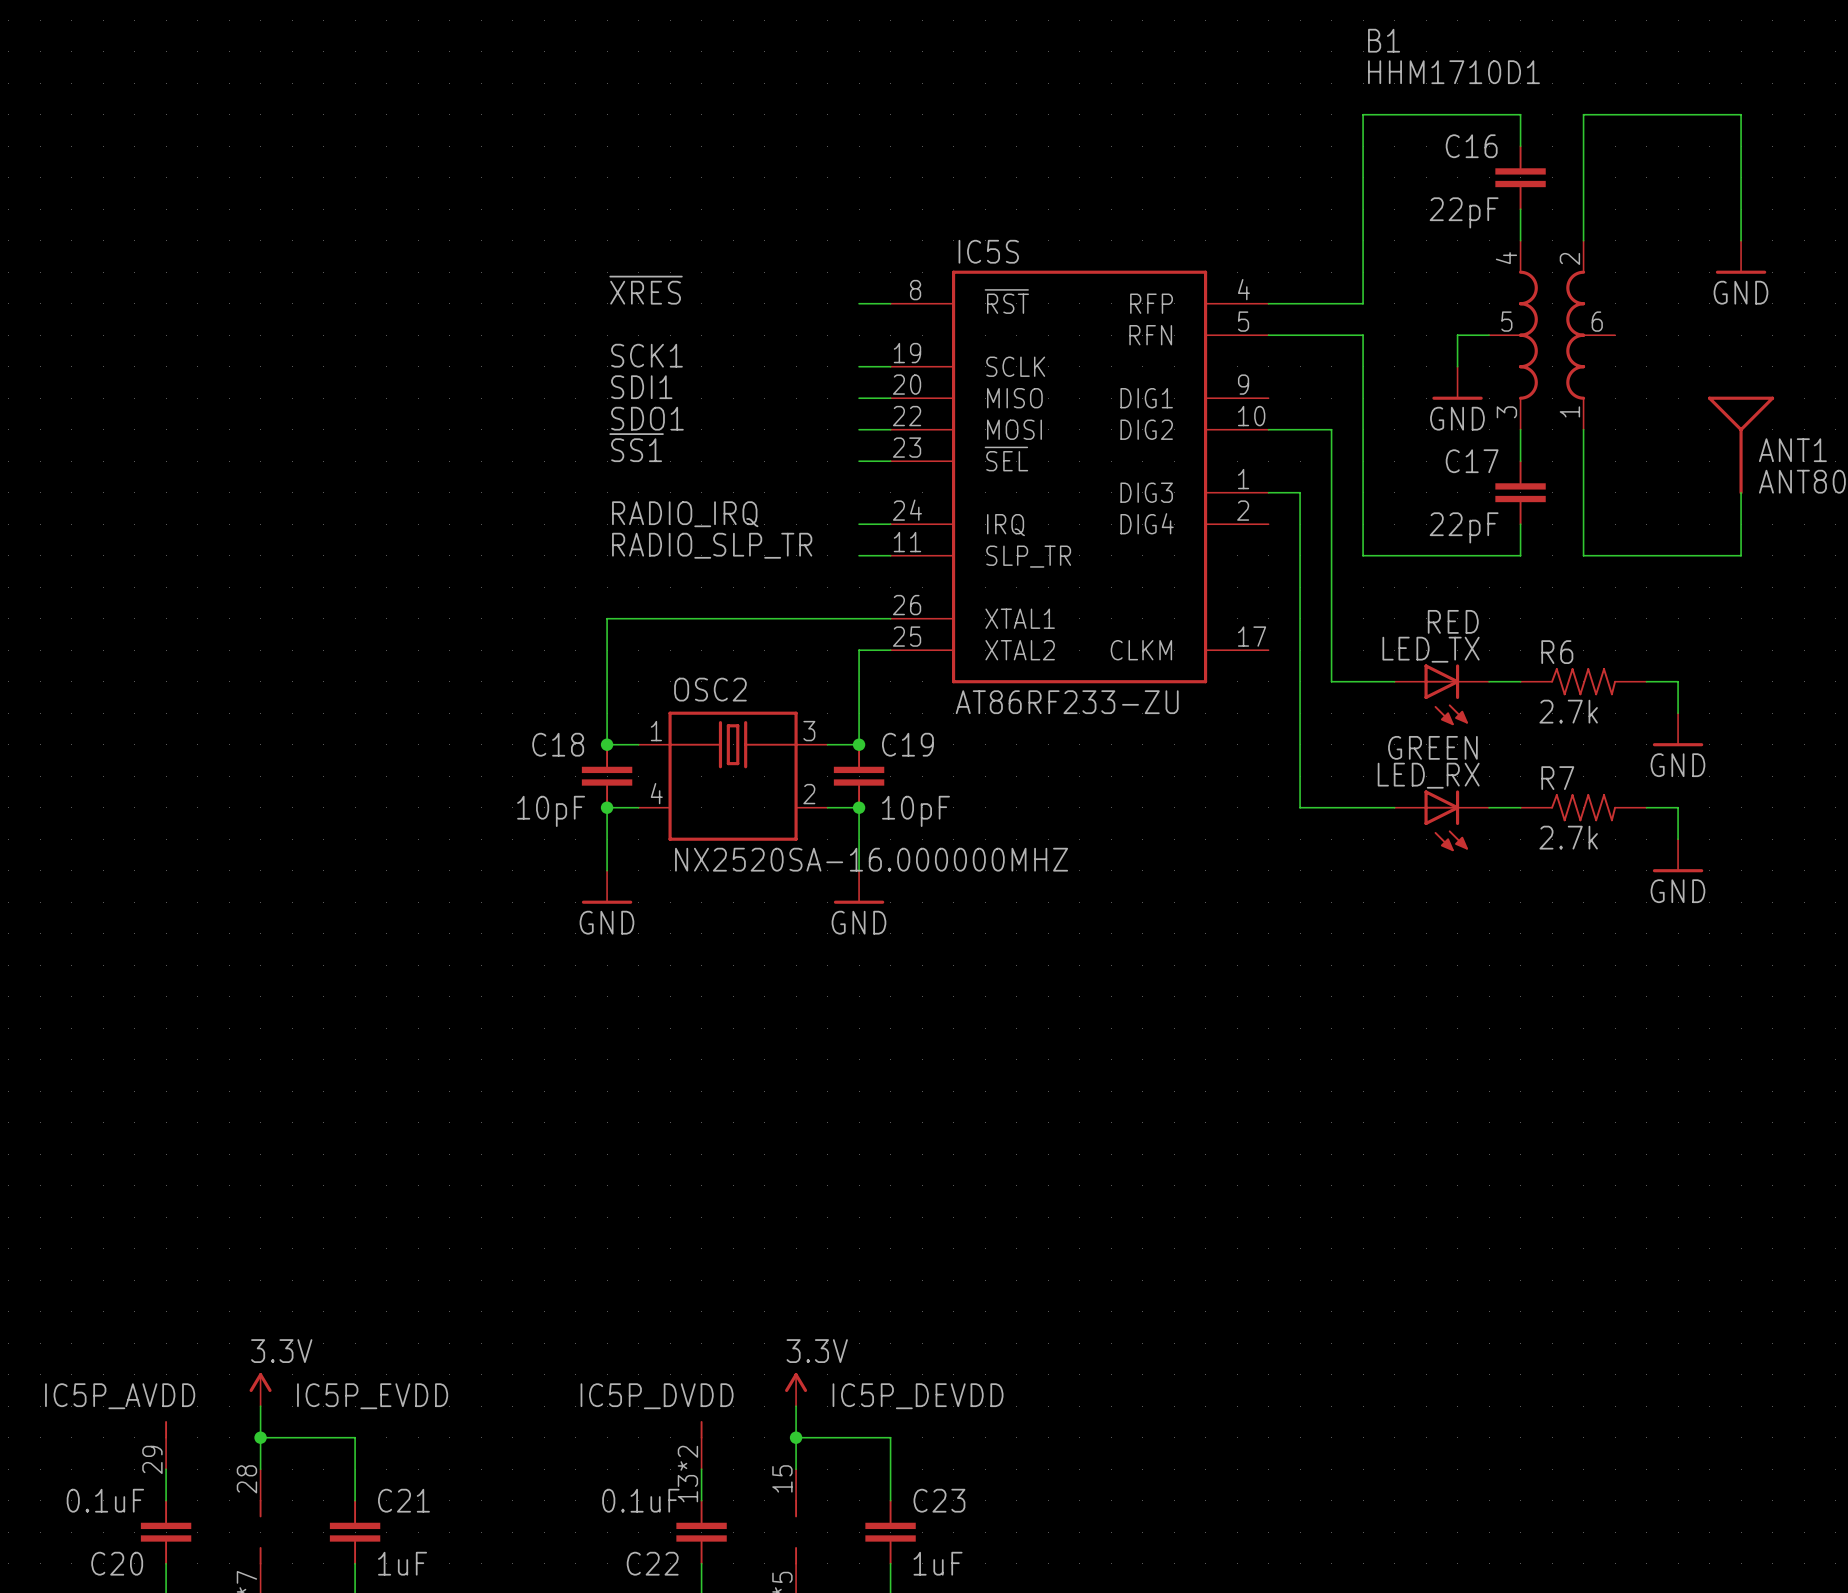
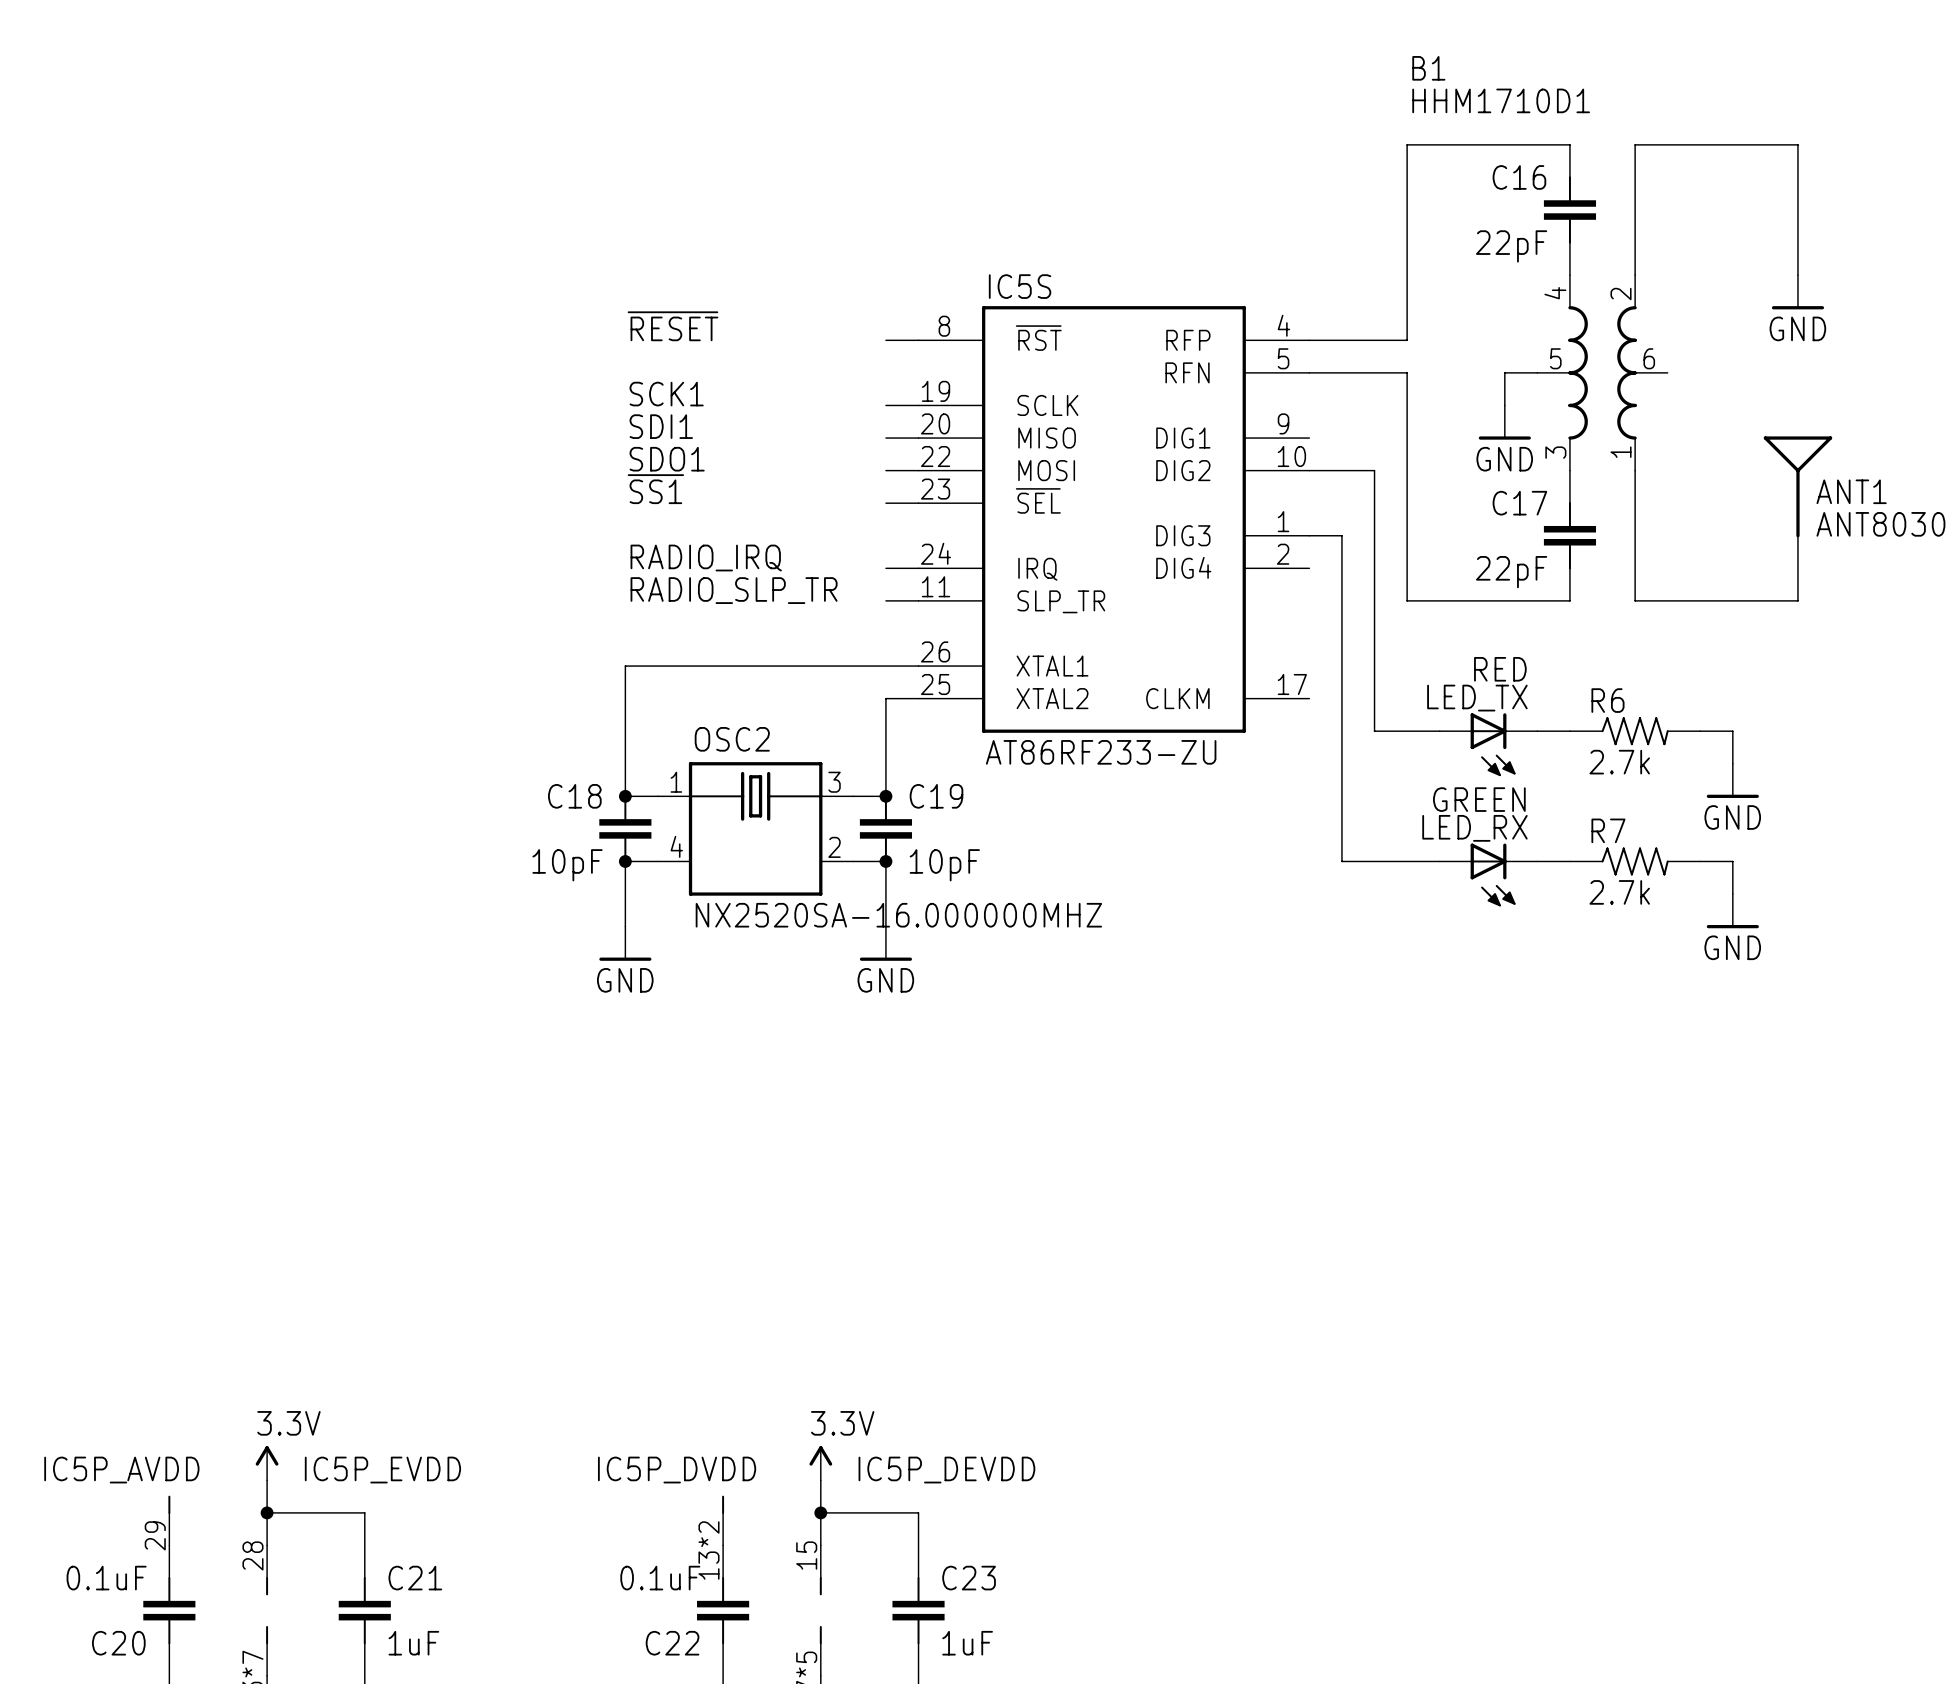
label: ~{XRES} (646, 290) -> ~{RESET} (673, 326)

